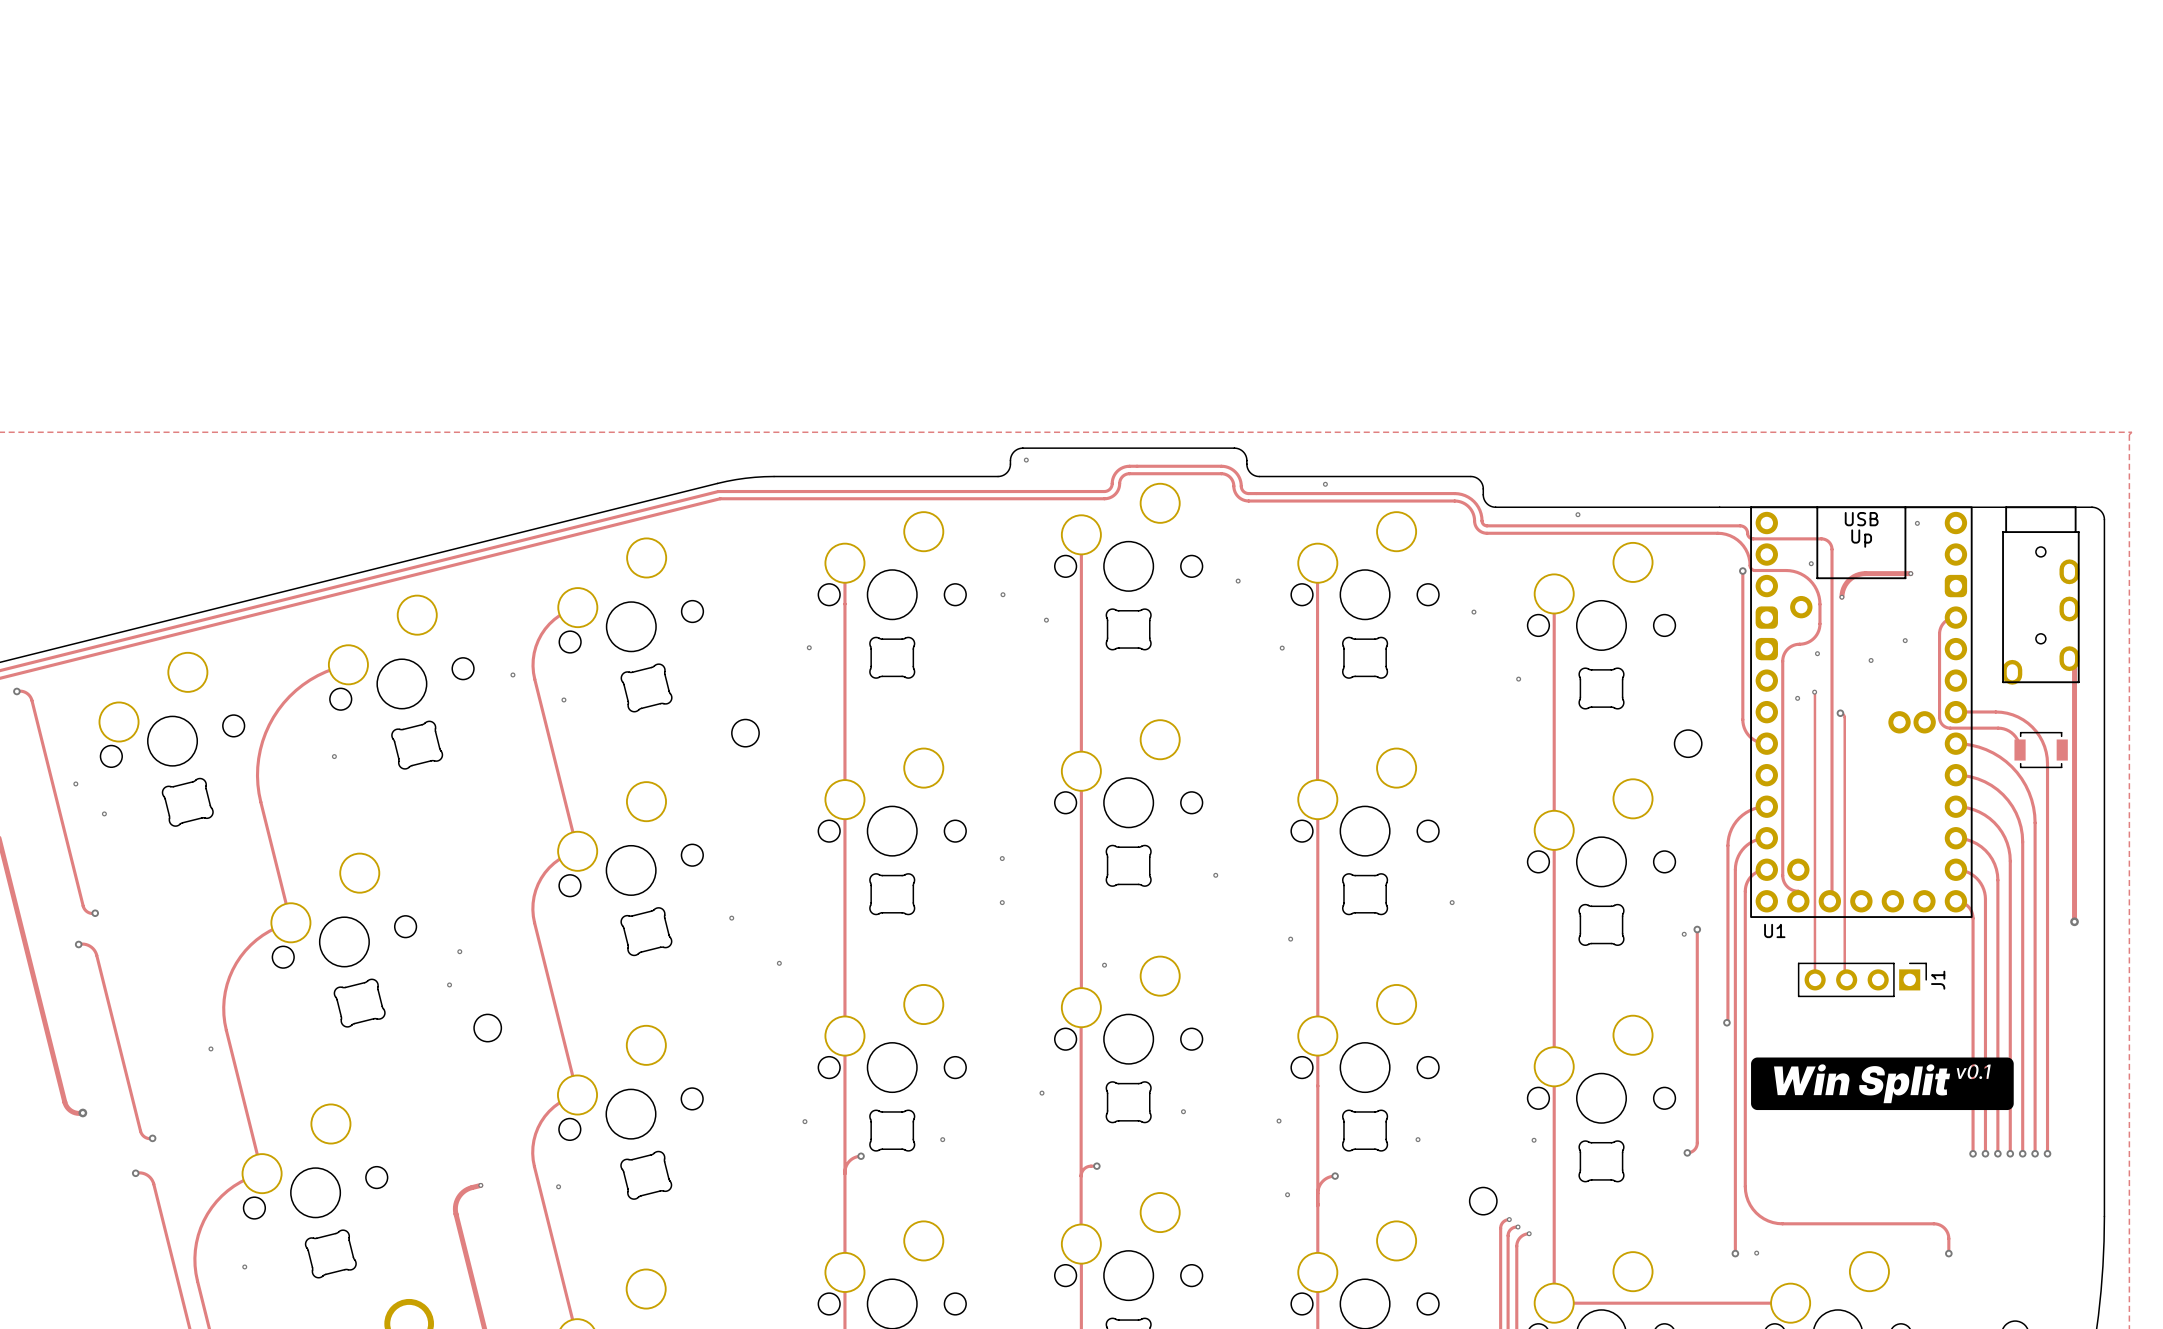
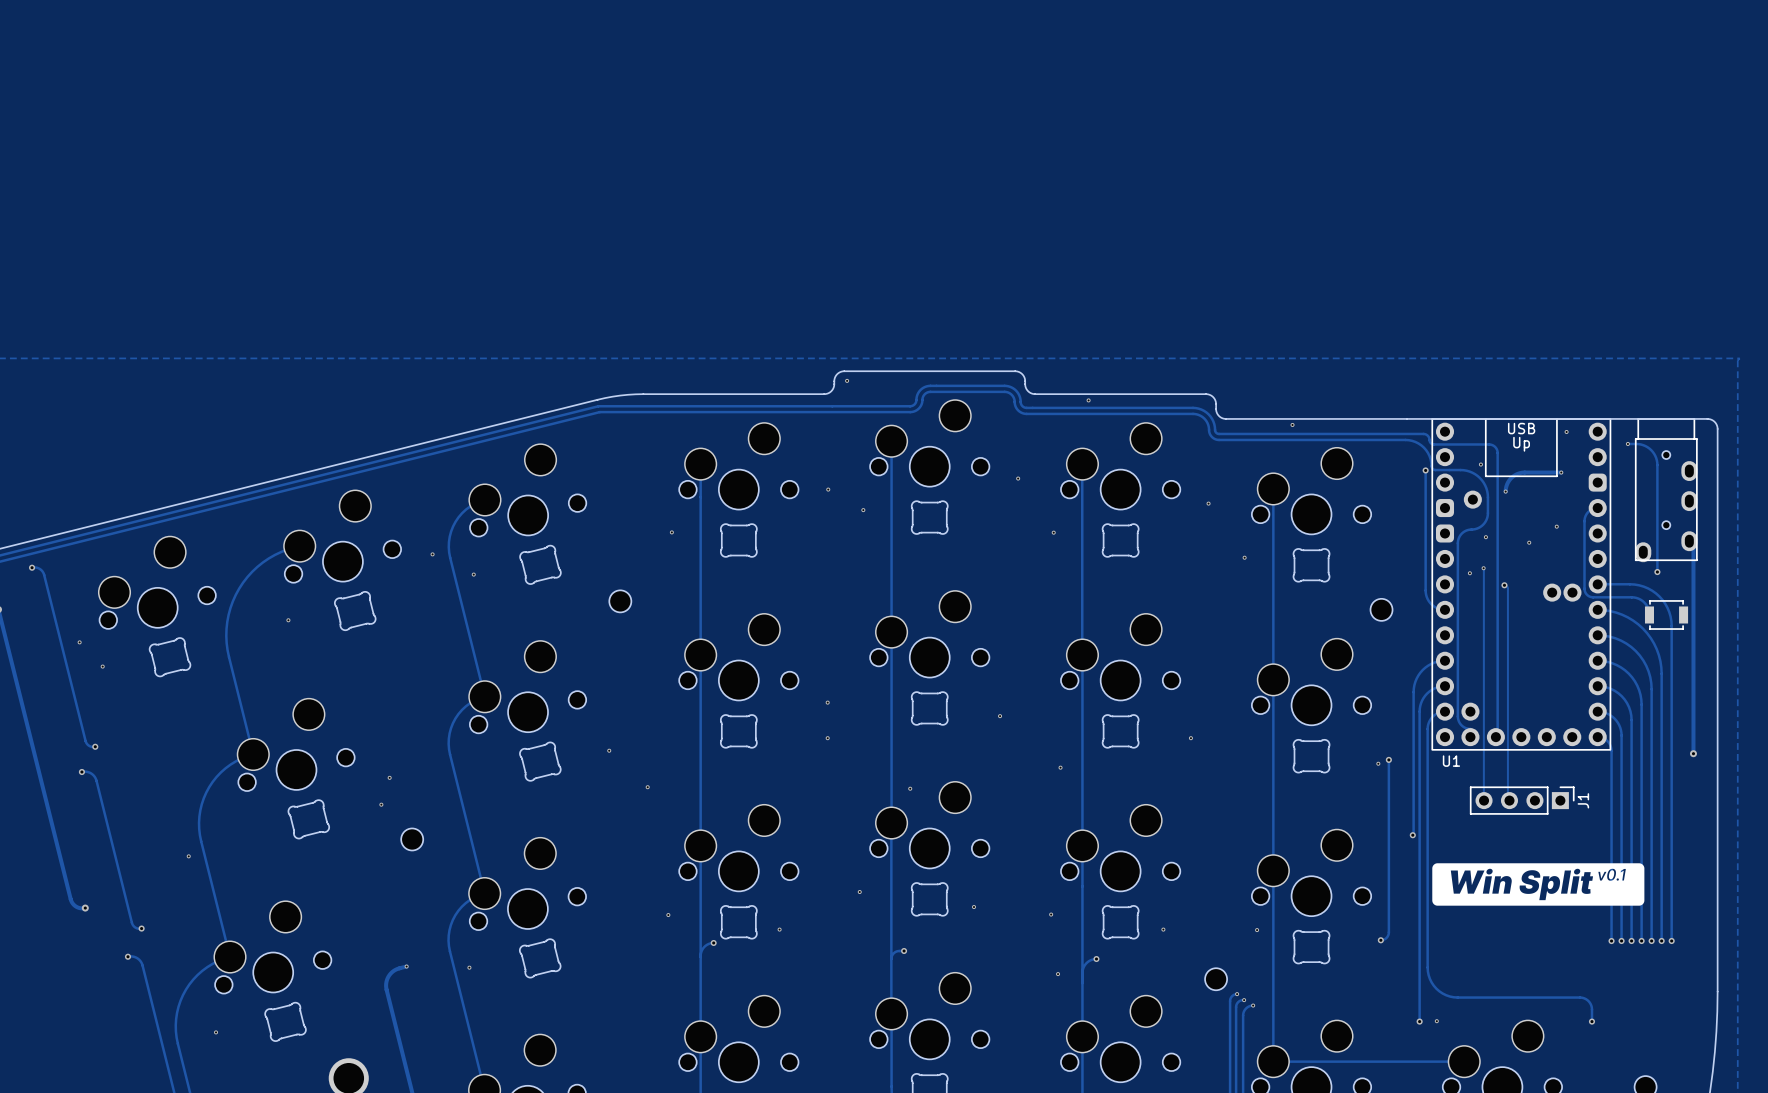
track: none -> (1627, 443) (1638, 444) (1647, 447) (1652, 451) (1656, 460) (1657, 572)
via: none -> (1627, 443)
via: none -> (1657, 572)

